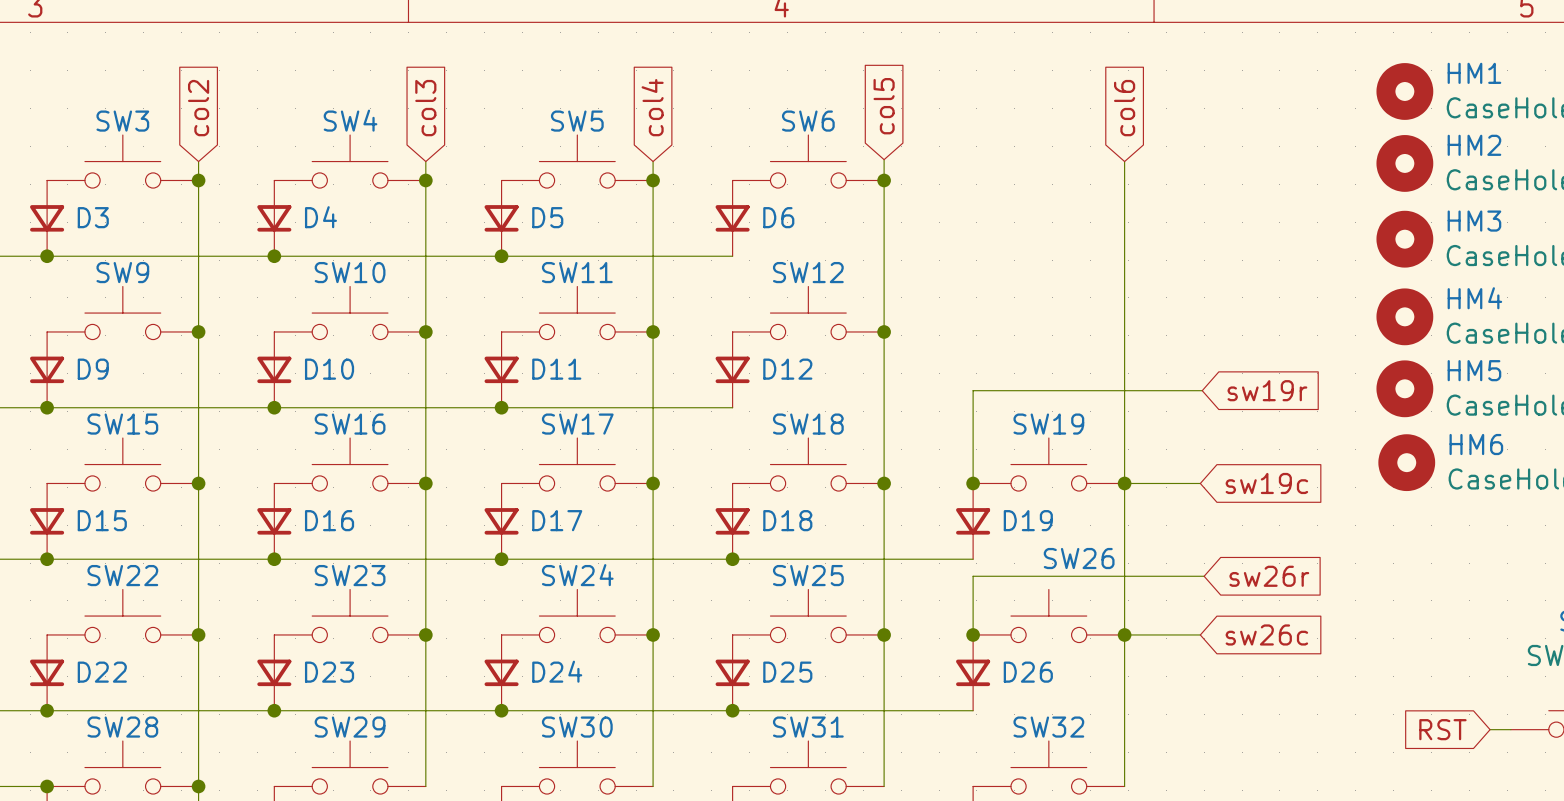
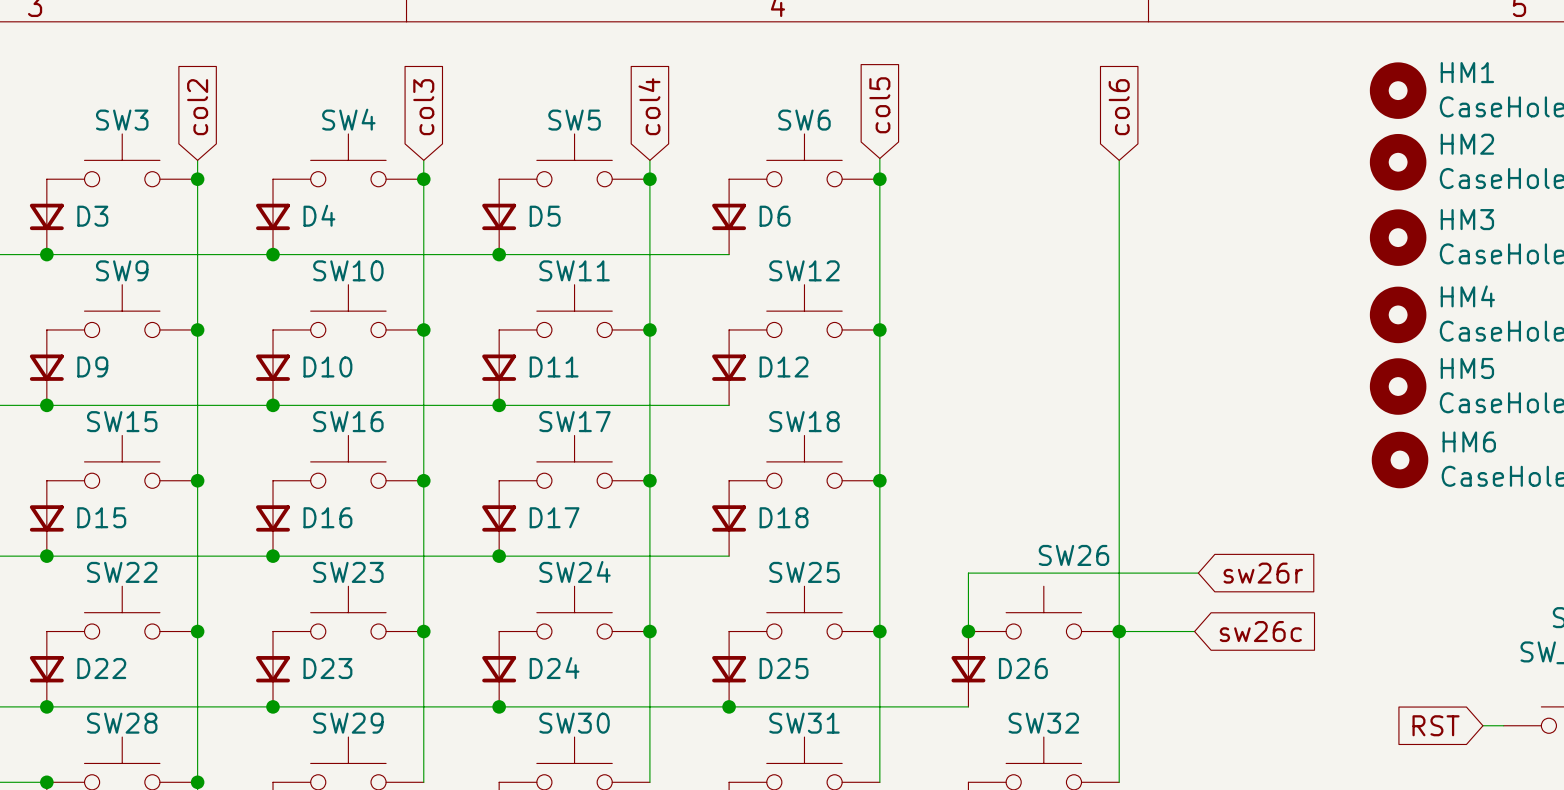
wire: (1202, 390) (973, 390) (973, 483) -> none
global label: sw19r (1267, 390) -> none
SW19: (1048, 464) -> none
junction: (973, 483) -> none
wire: (1124, 483) (1200, 483) -> none
junction: (1124, 483) -> none
global label: sw19c (1266, 483) -> none
D19: (973, 521) -> none
wire: (732, 559) (973, 559) -> none
junction: (732, 559) -> none

